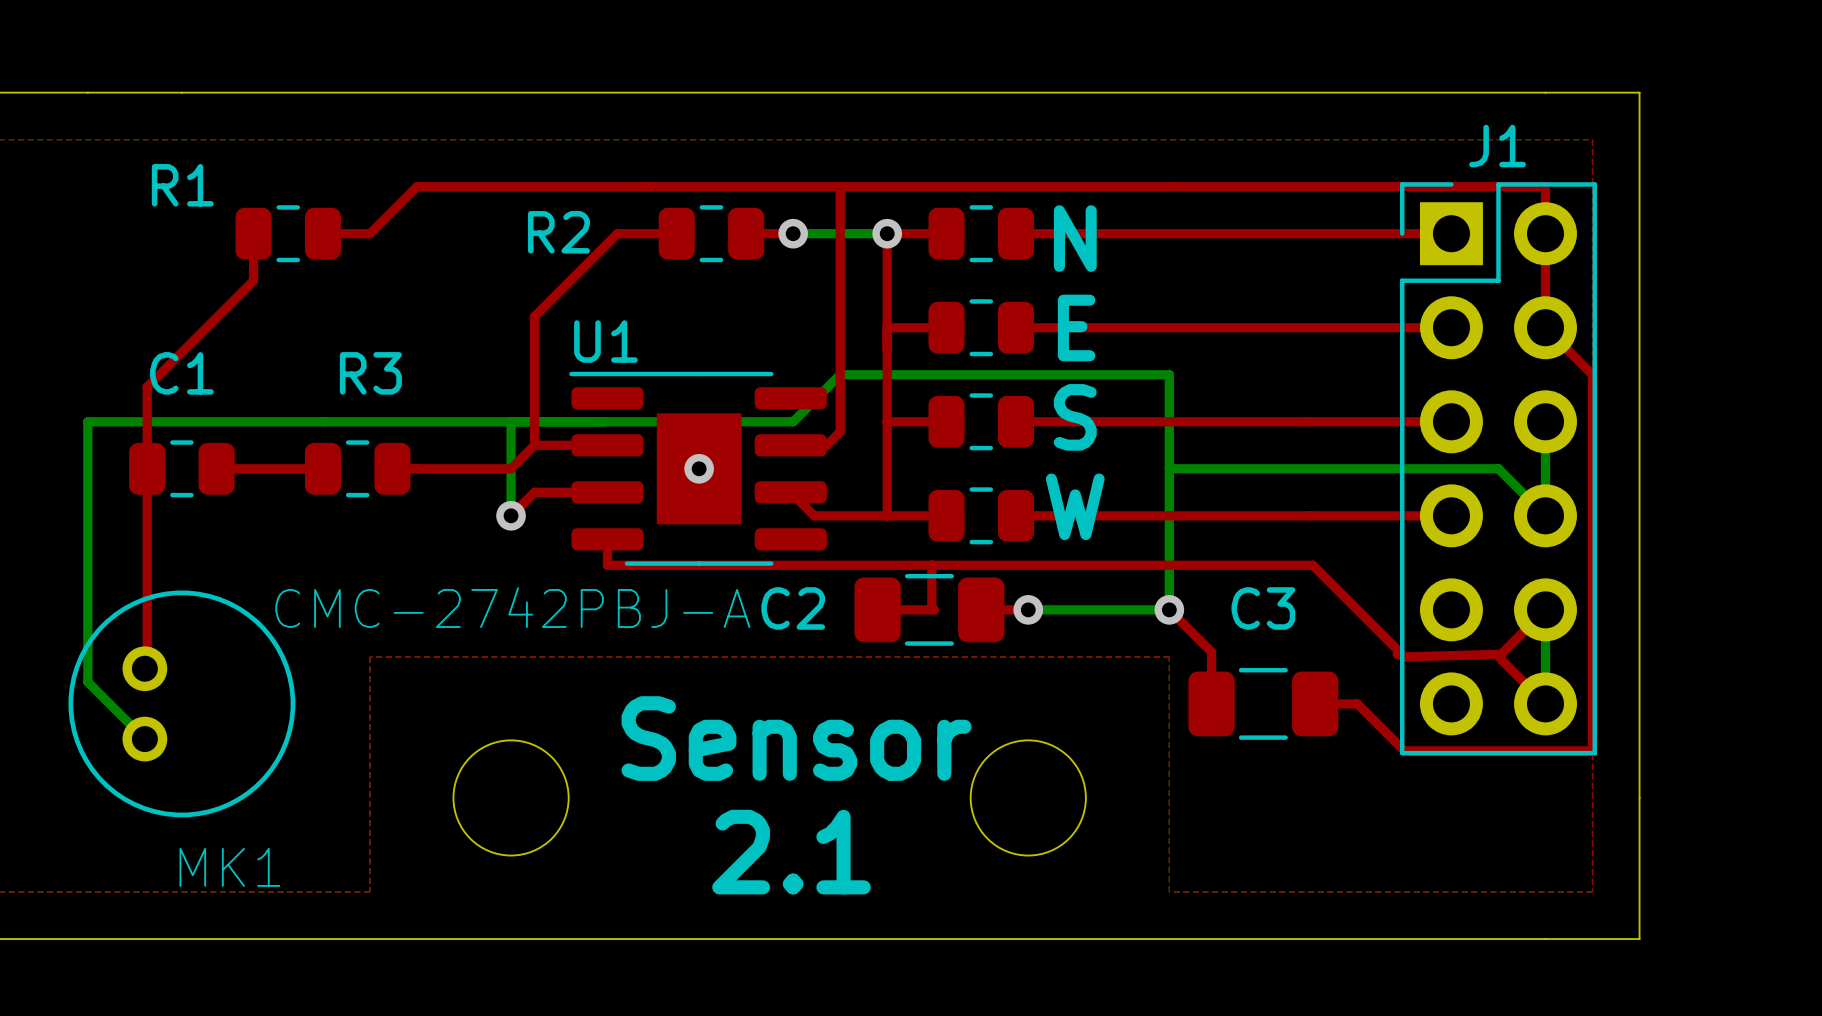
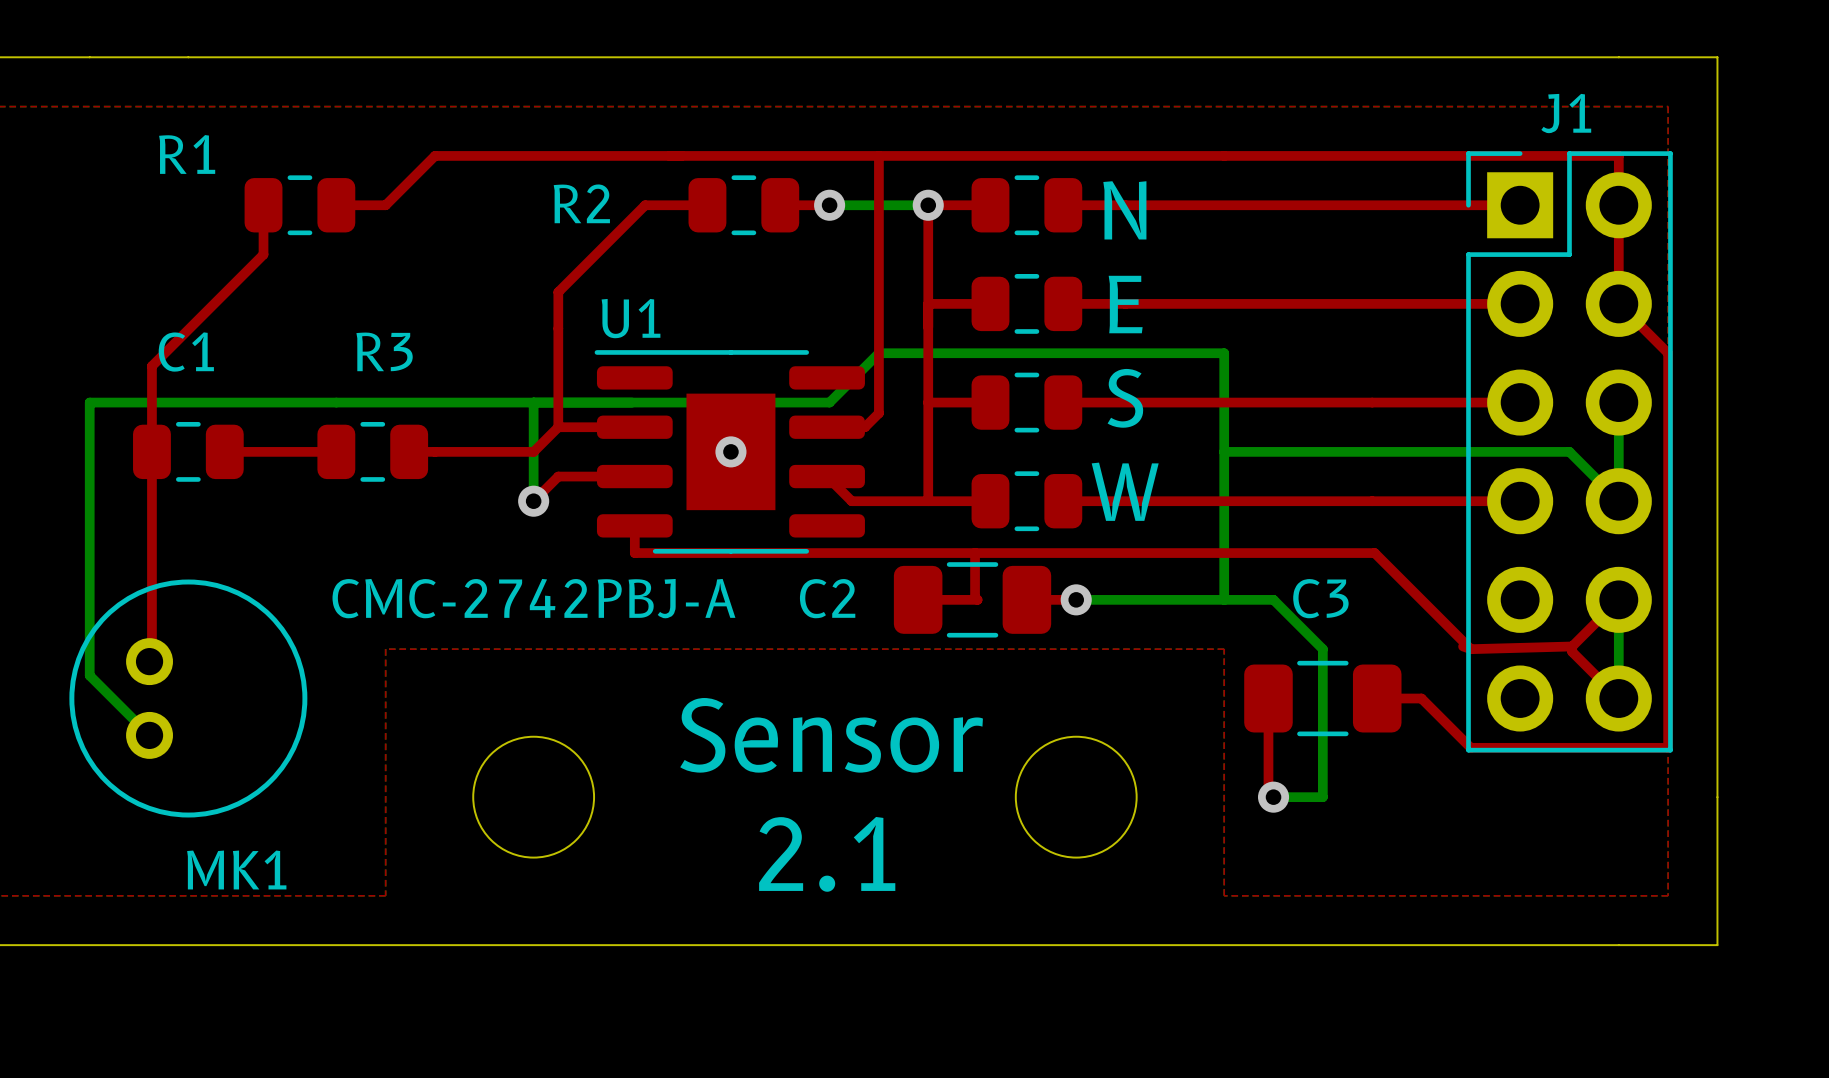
top track: (1169, 609) (1211, 652) (1211, 703) -> (1273, 797) (1268, 792) (1268, 698)
bottom track: none -> (1224, 599) (1273, 599) (1322, 649) (1322, 797) (1273, 797)
via position: (1169, 609) -> (1273, 797)

